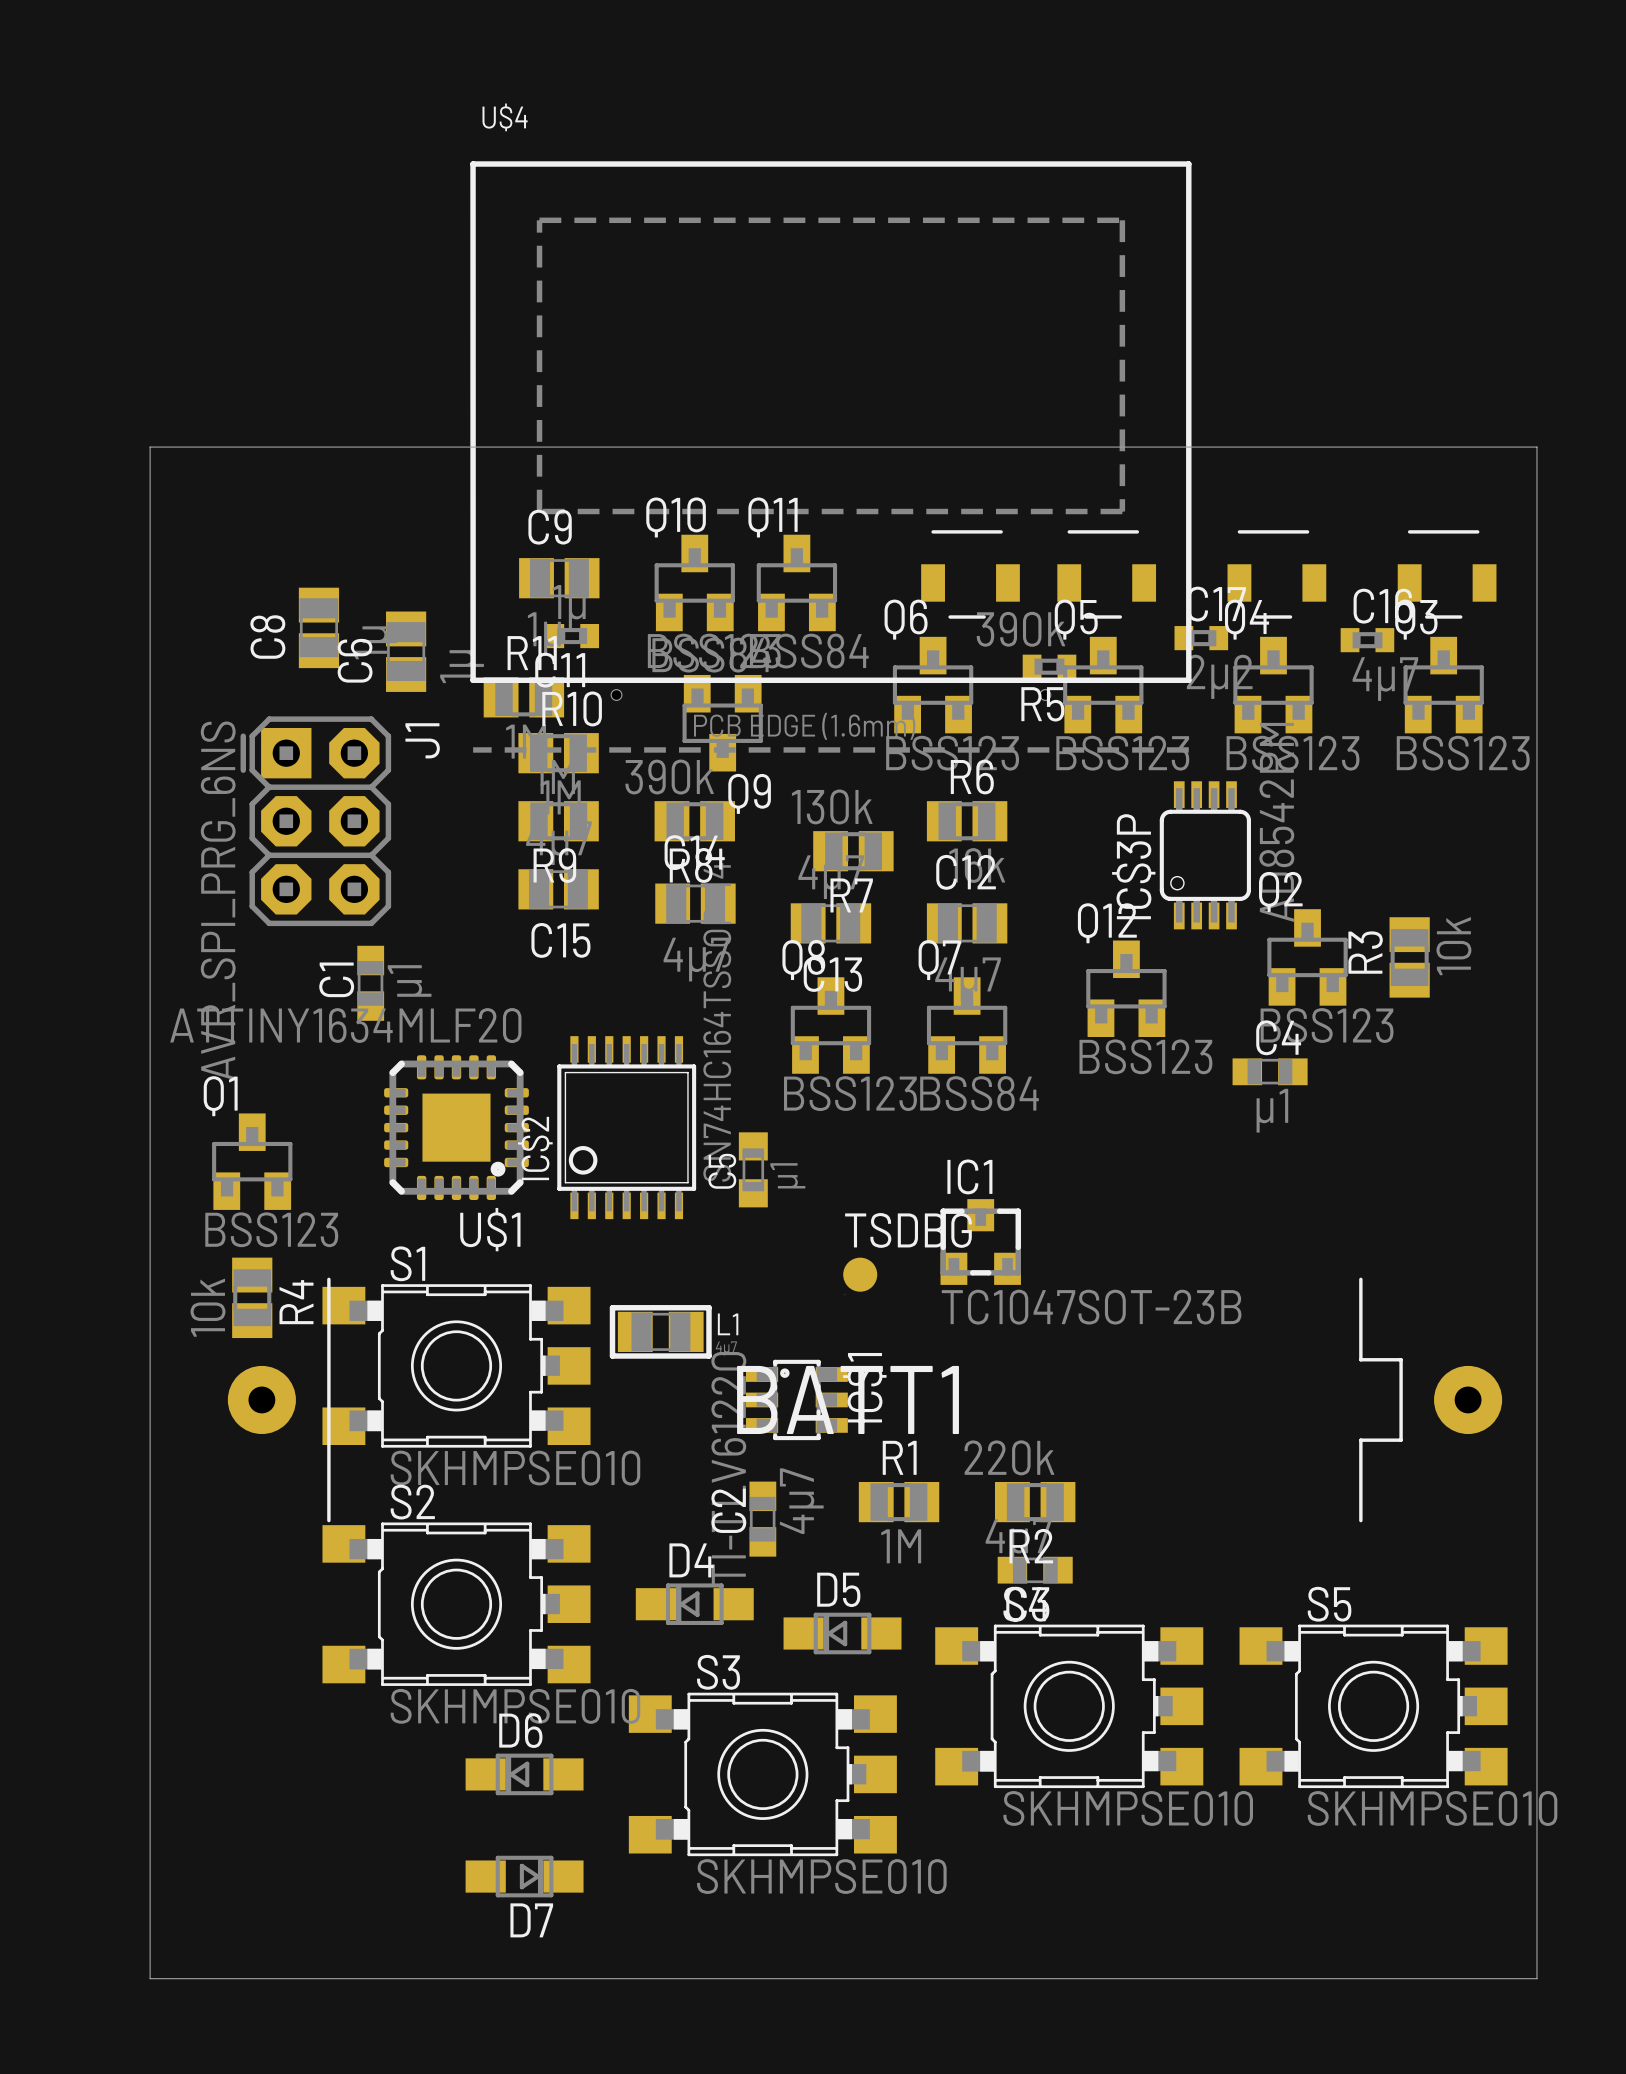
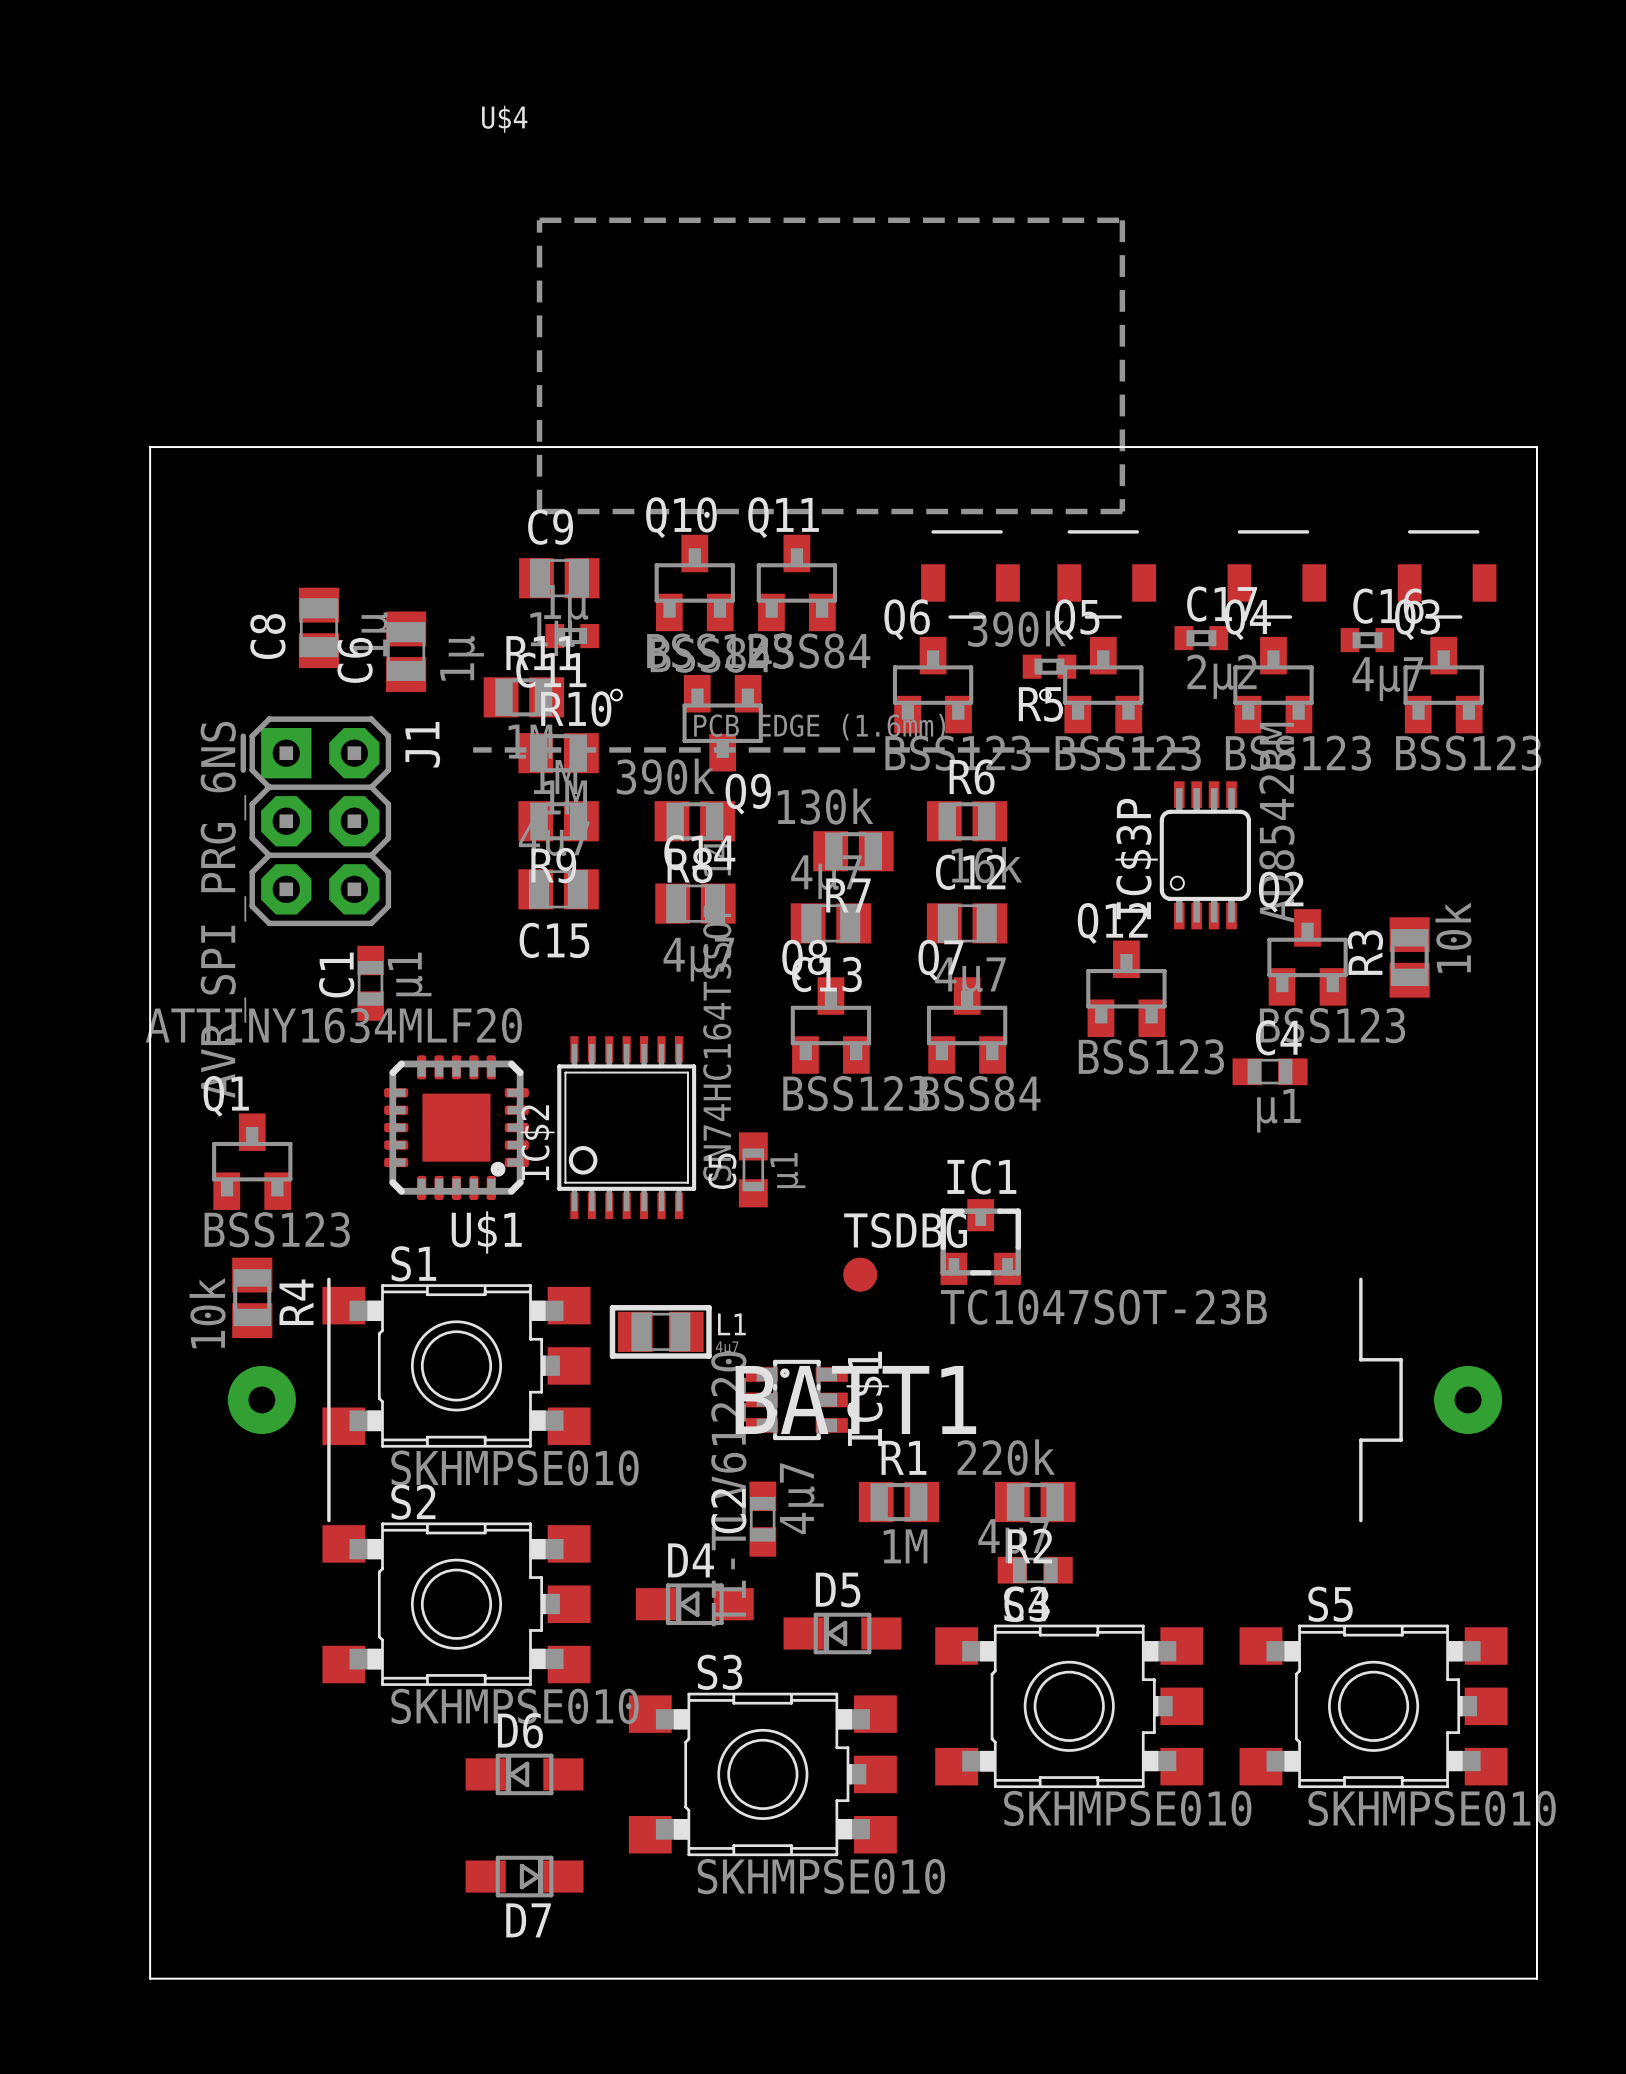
U$4 footprint: [470, 161, 1192, 753] -> [470, 217, 1192, 753]

